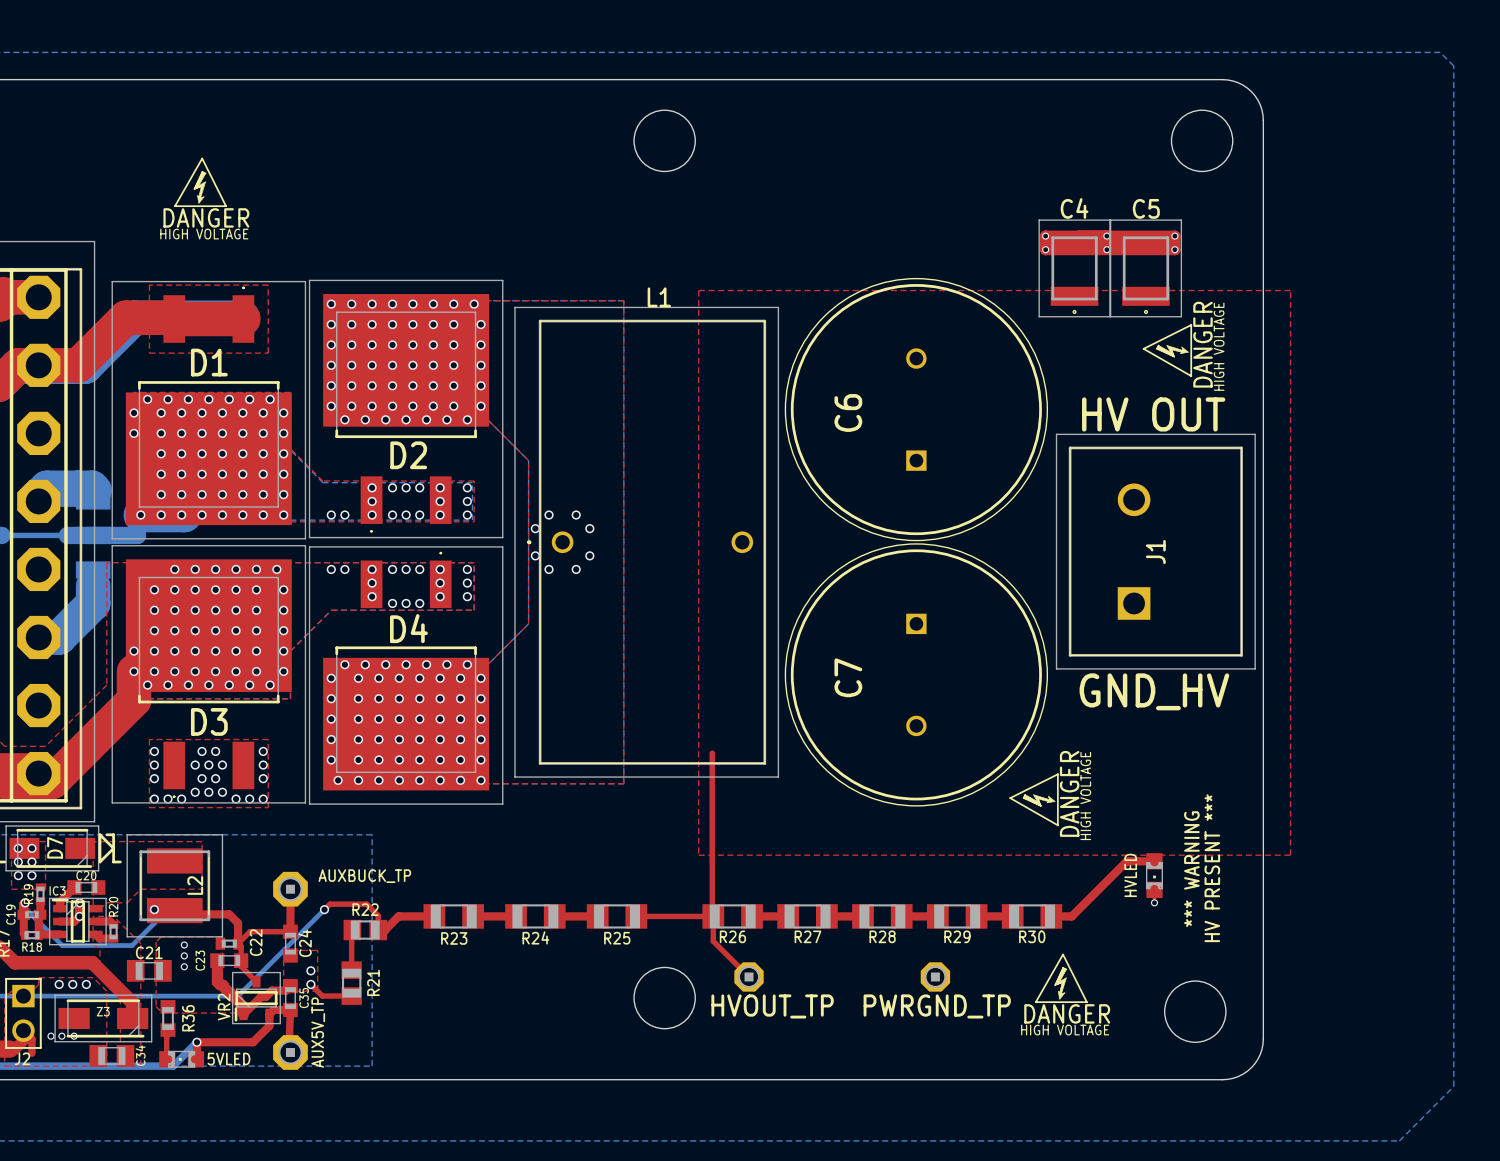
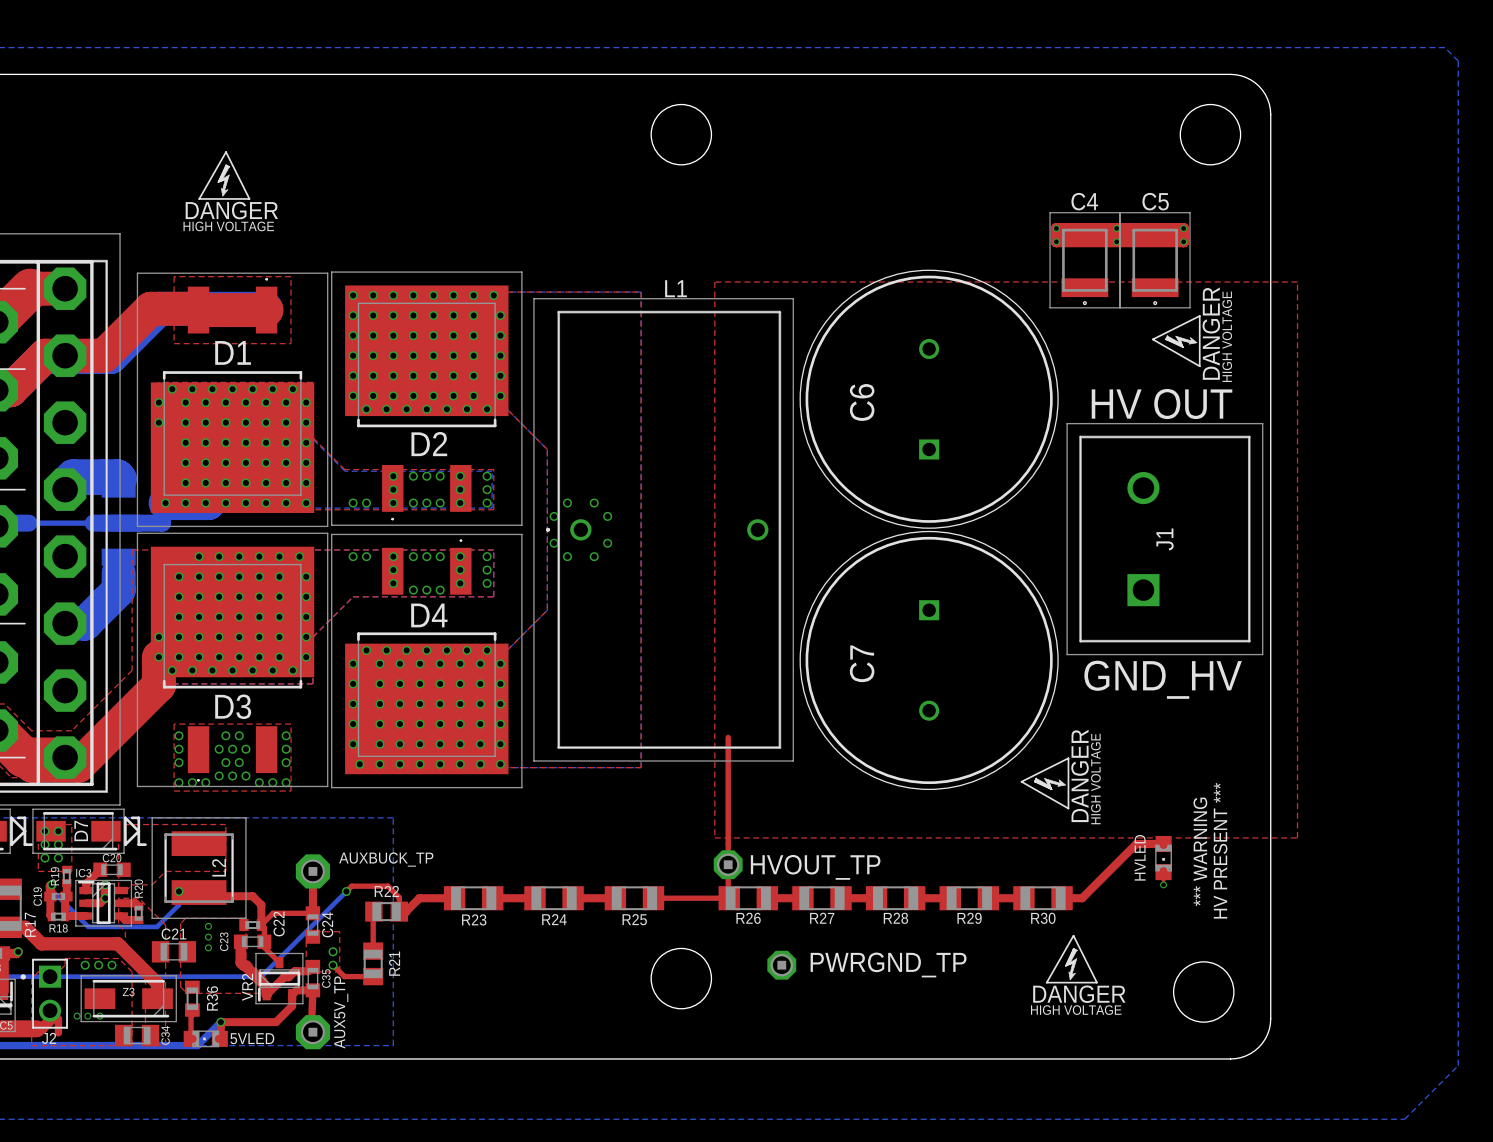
top track: (712, 916) (713, 941) (749, 976) -> none
HVOUT_TP position: (749, 976) -> (728, 864)
PWRGND_TP position: (935, 976) -> (781, 965)
HVOUT_TP name position: HVOUT_TP (772, 1006) -> HVOUT_TP (815, 867)
PWRGND_TP name position: PWRGND_TP (937, 1006) -> PWRGND_TP (888, 964)

